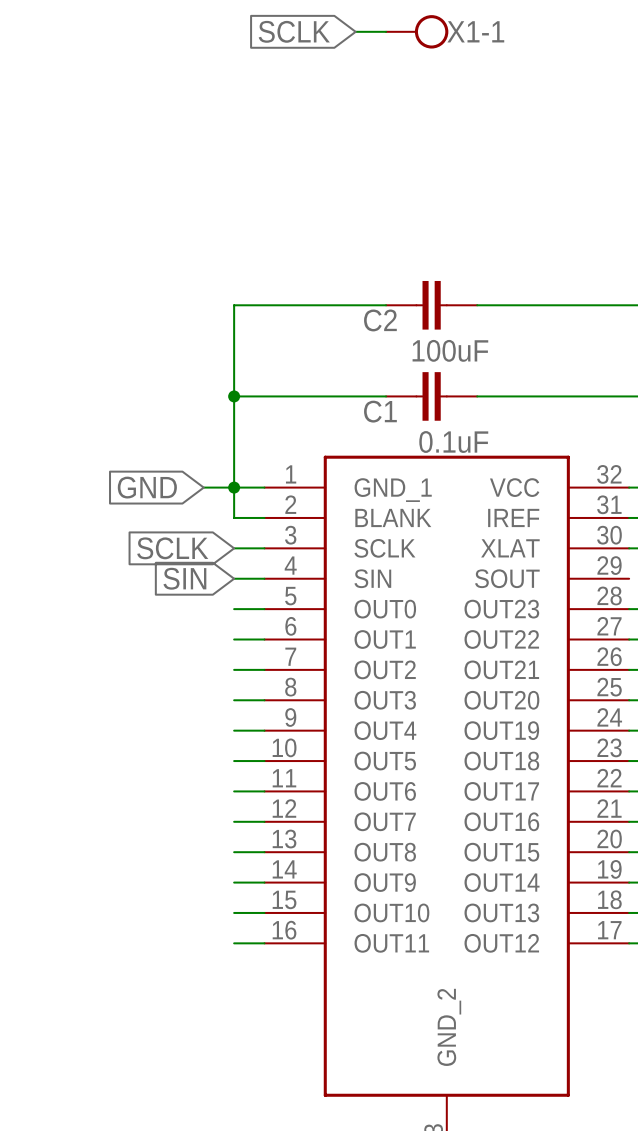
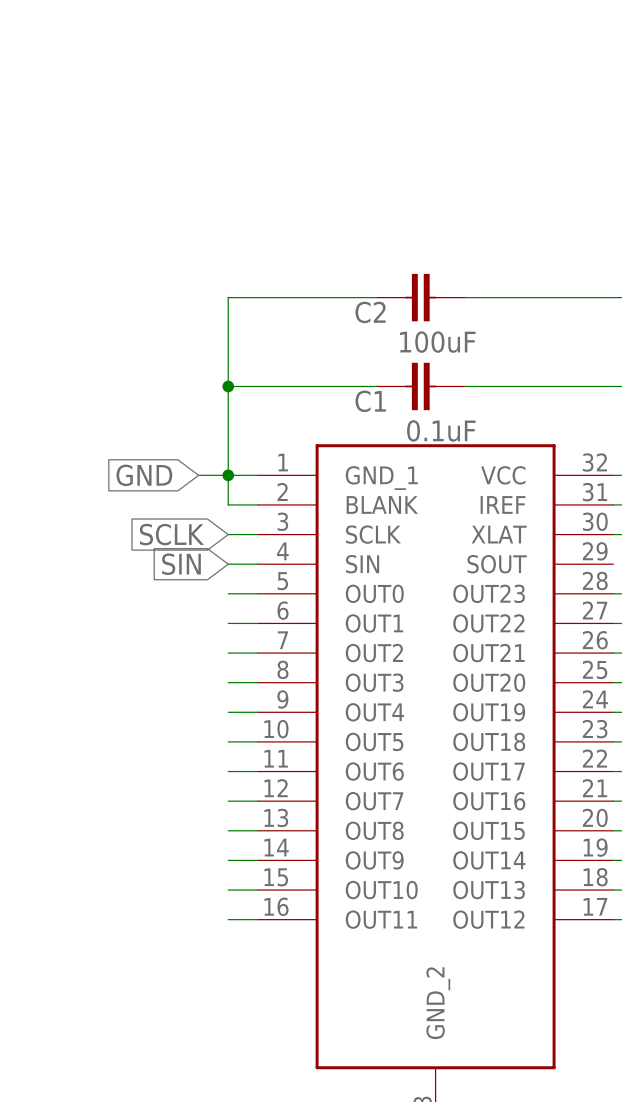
global label: SCLK (294, 31) -> none
wire: (355, 31) (386, 31) -> none
X1-1: (417, 31) -> none

